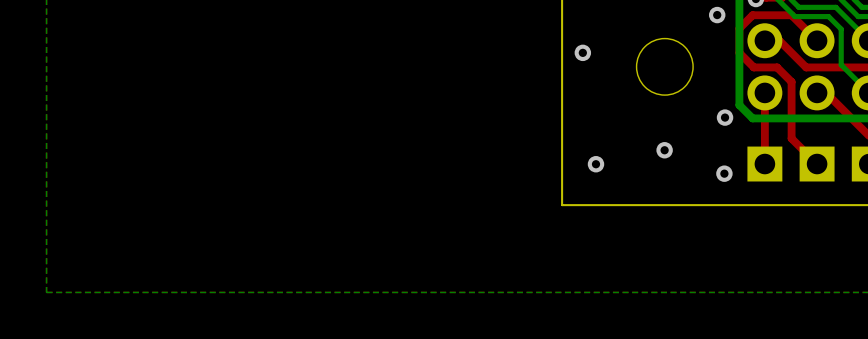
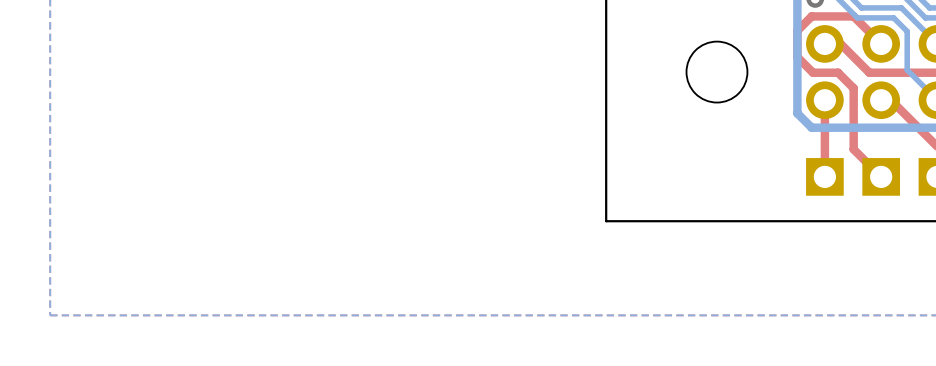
via: (717, 15) -> none
via: (582, 52) -> none
via: (725, 117) -> none
via: (664, 150) -> none
via: (595, 164) -> none
via: (724, 173) -> none

